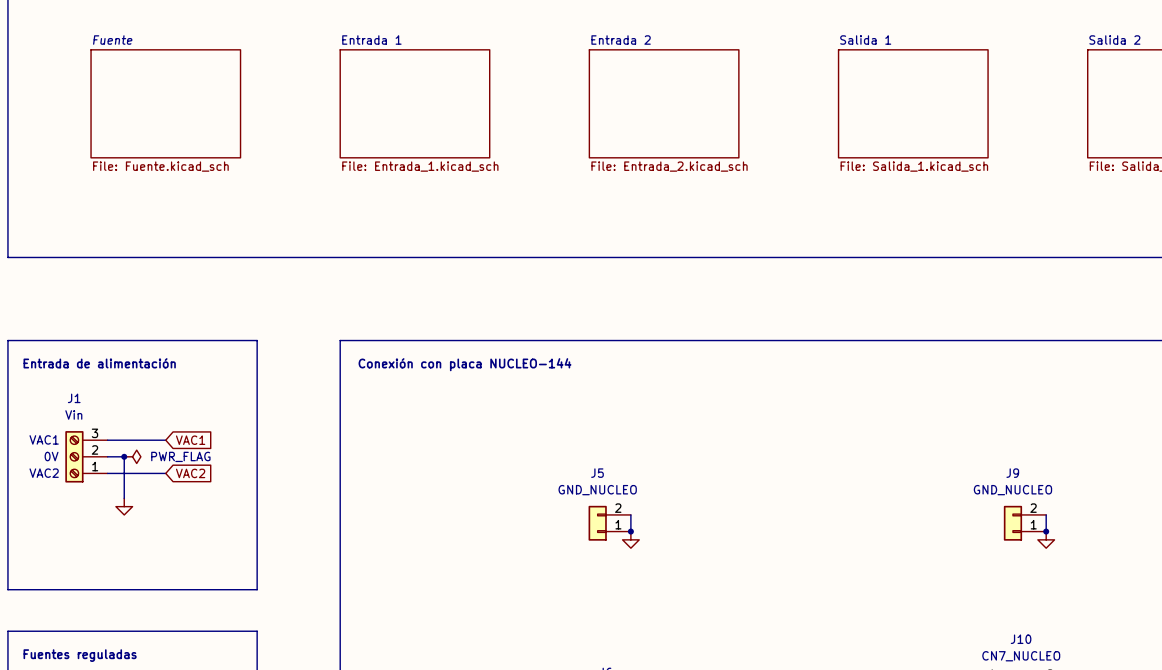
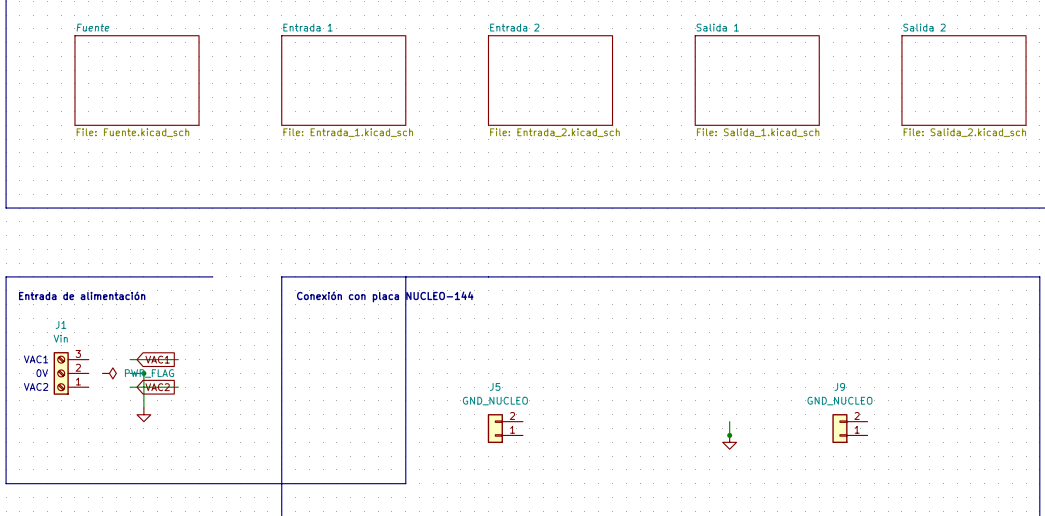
line: (257, 340) (257, 589) -> (405, 276) (405, 483) (212, 483)
wire: (107, 440) (157, 440) -> (137, 359) (178, 359)
wire: (107, 456) (124, 456) (124, 498) -> (130, 373) (143, 373) (143, 407)
junction: (124, 456) -> none
junction: none -> (143, 373)
wire: (107, 473) (157, 473) -> (137, 387) (178, 387)
power symbol position: (124, 506) -> (143, 414)
wire: (630, 514) (630, 531) -> none
wire: none -> (729, 421) (729, 435)
wire: (1046, 514) (1046, 531) -> none
junction: (630, 531) -> none
junction: none -> (729, 435)
junction: (1046, 531) -> none
power symbol: (630, 539) -> none
power symbol: none -> (729, 442)
power symbol: (1046, 539) -> none

